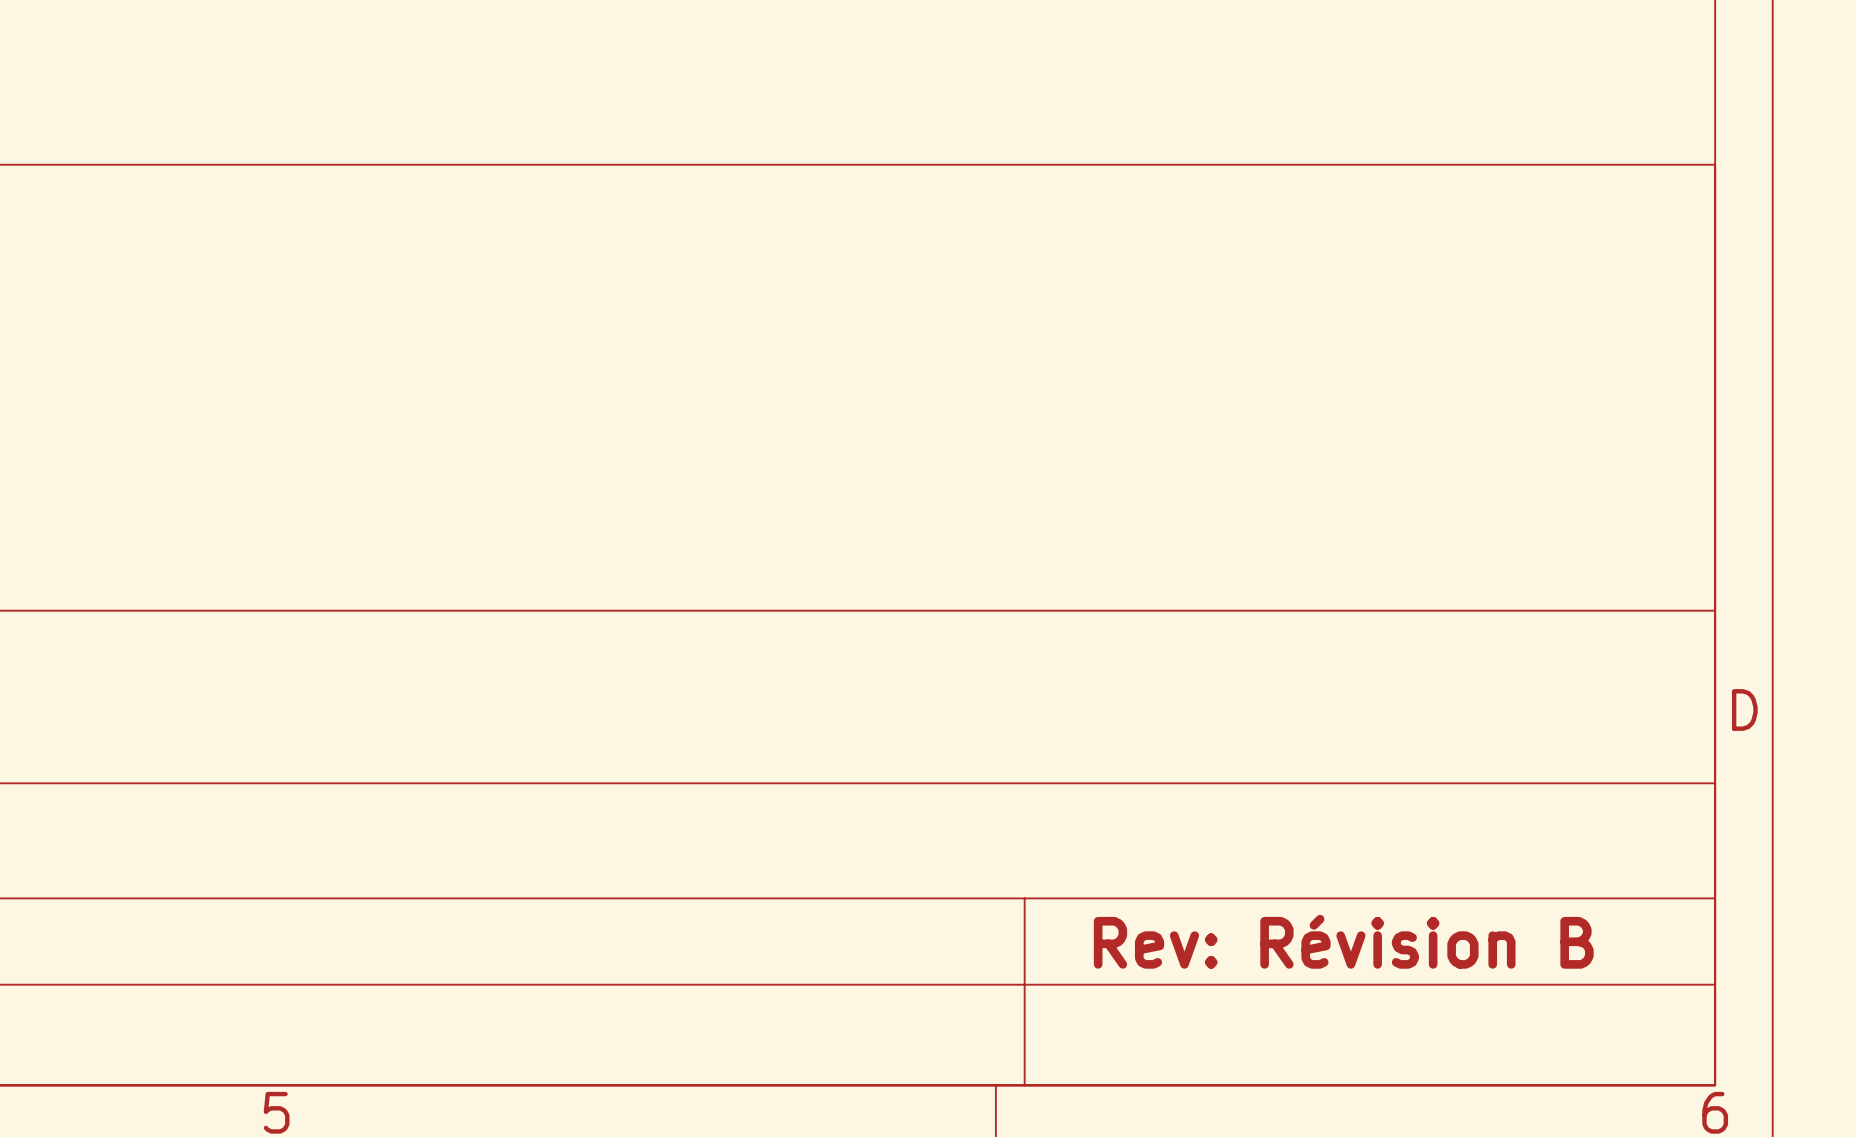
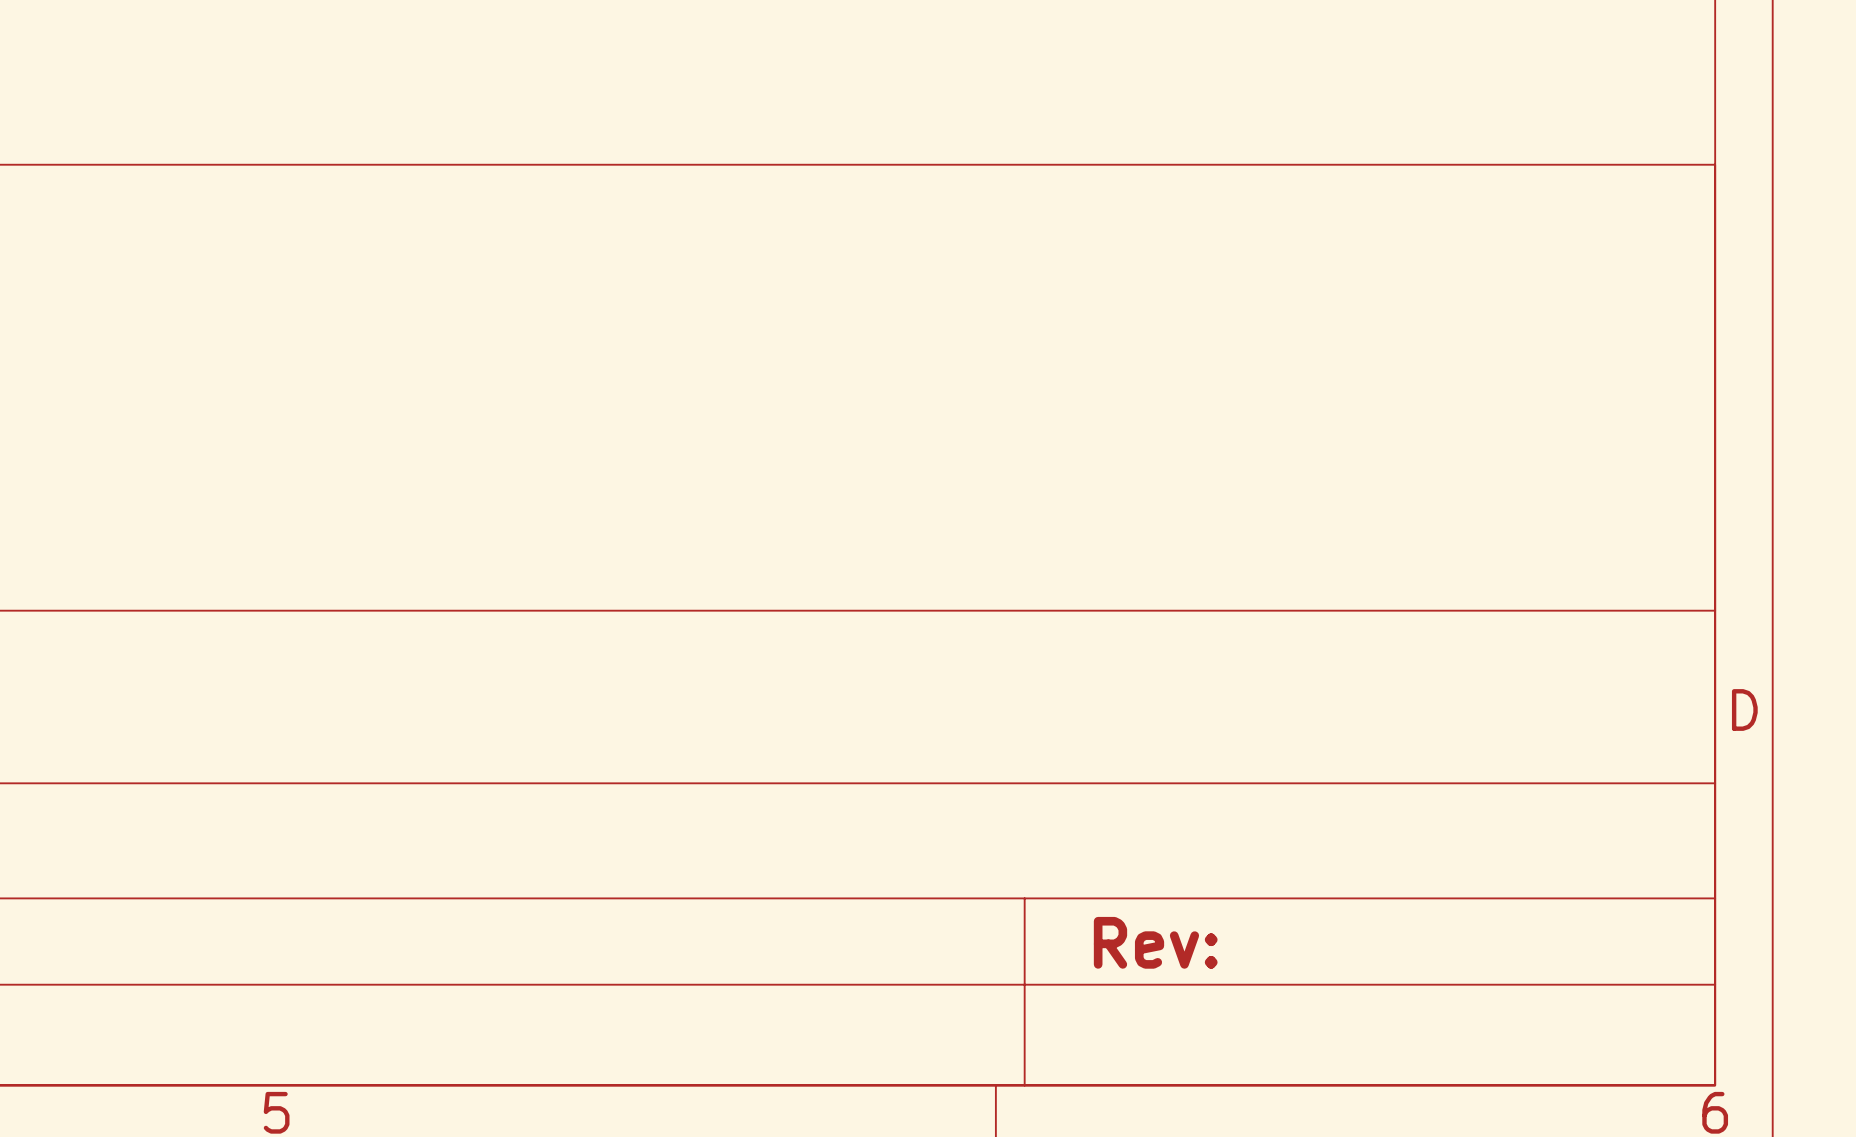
title block: Rev: Révision B (1343, 941) -> Rev: (1155, 942)

